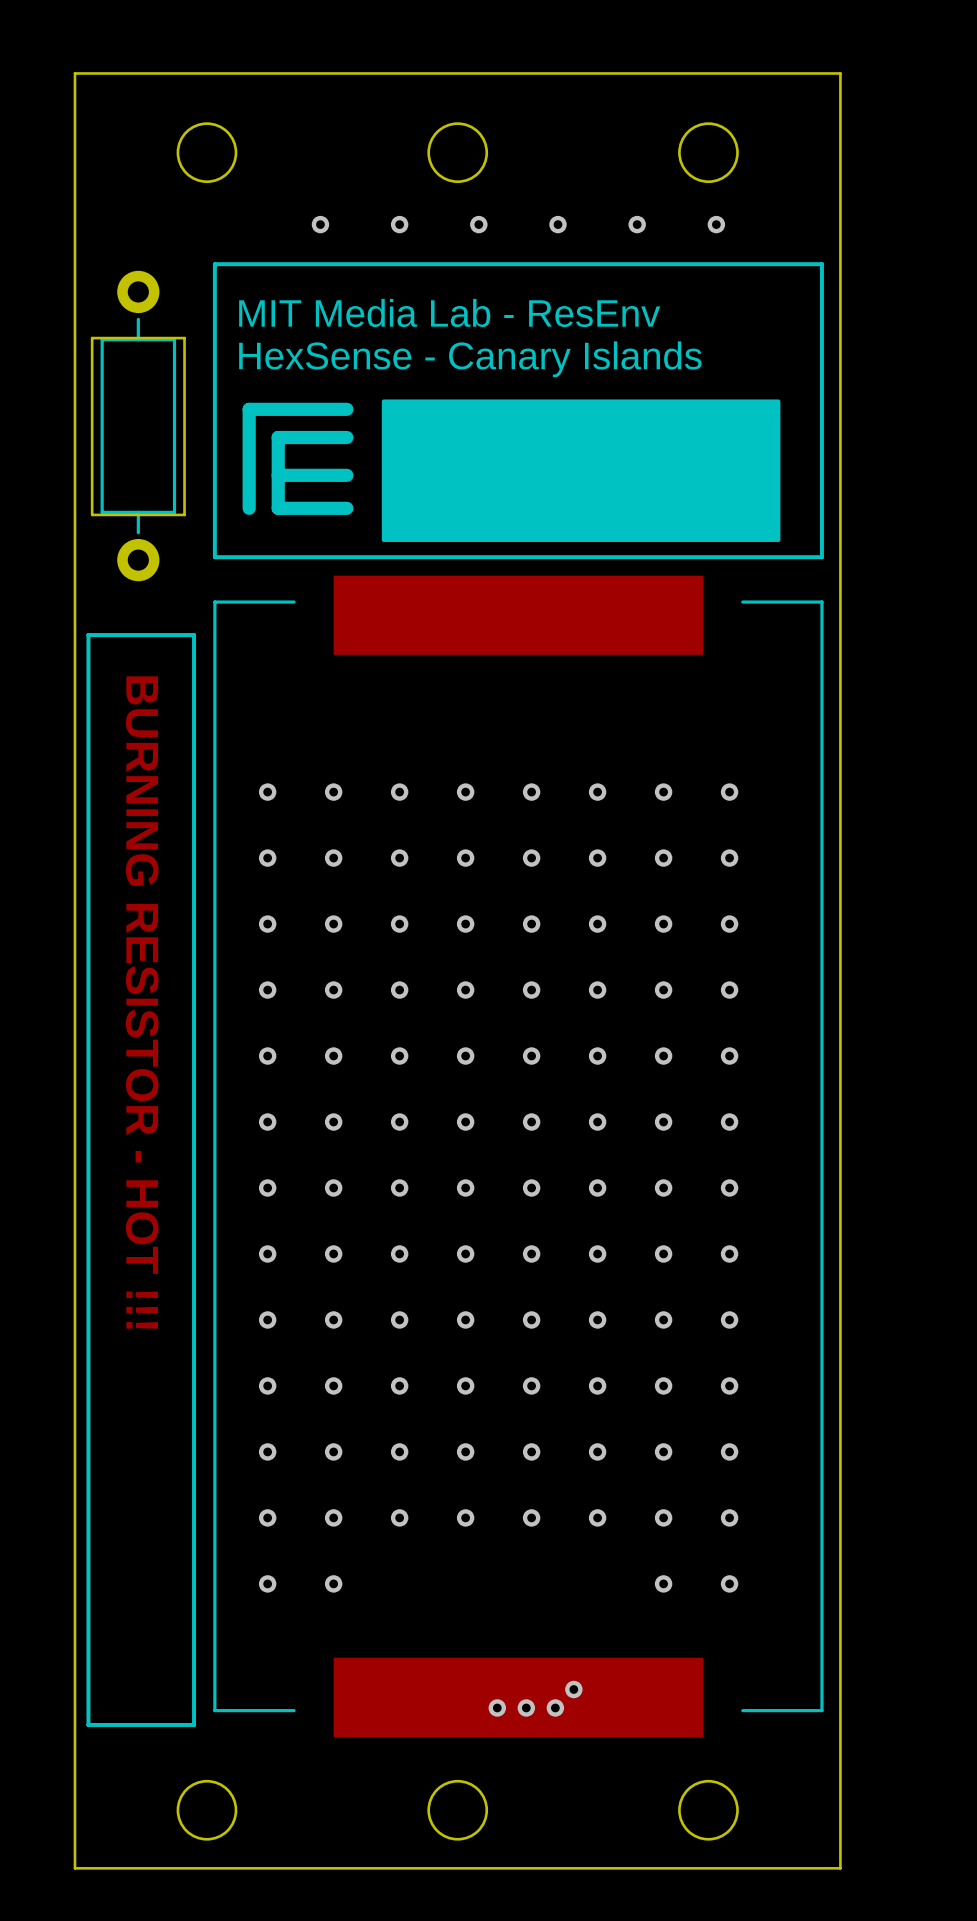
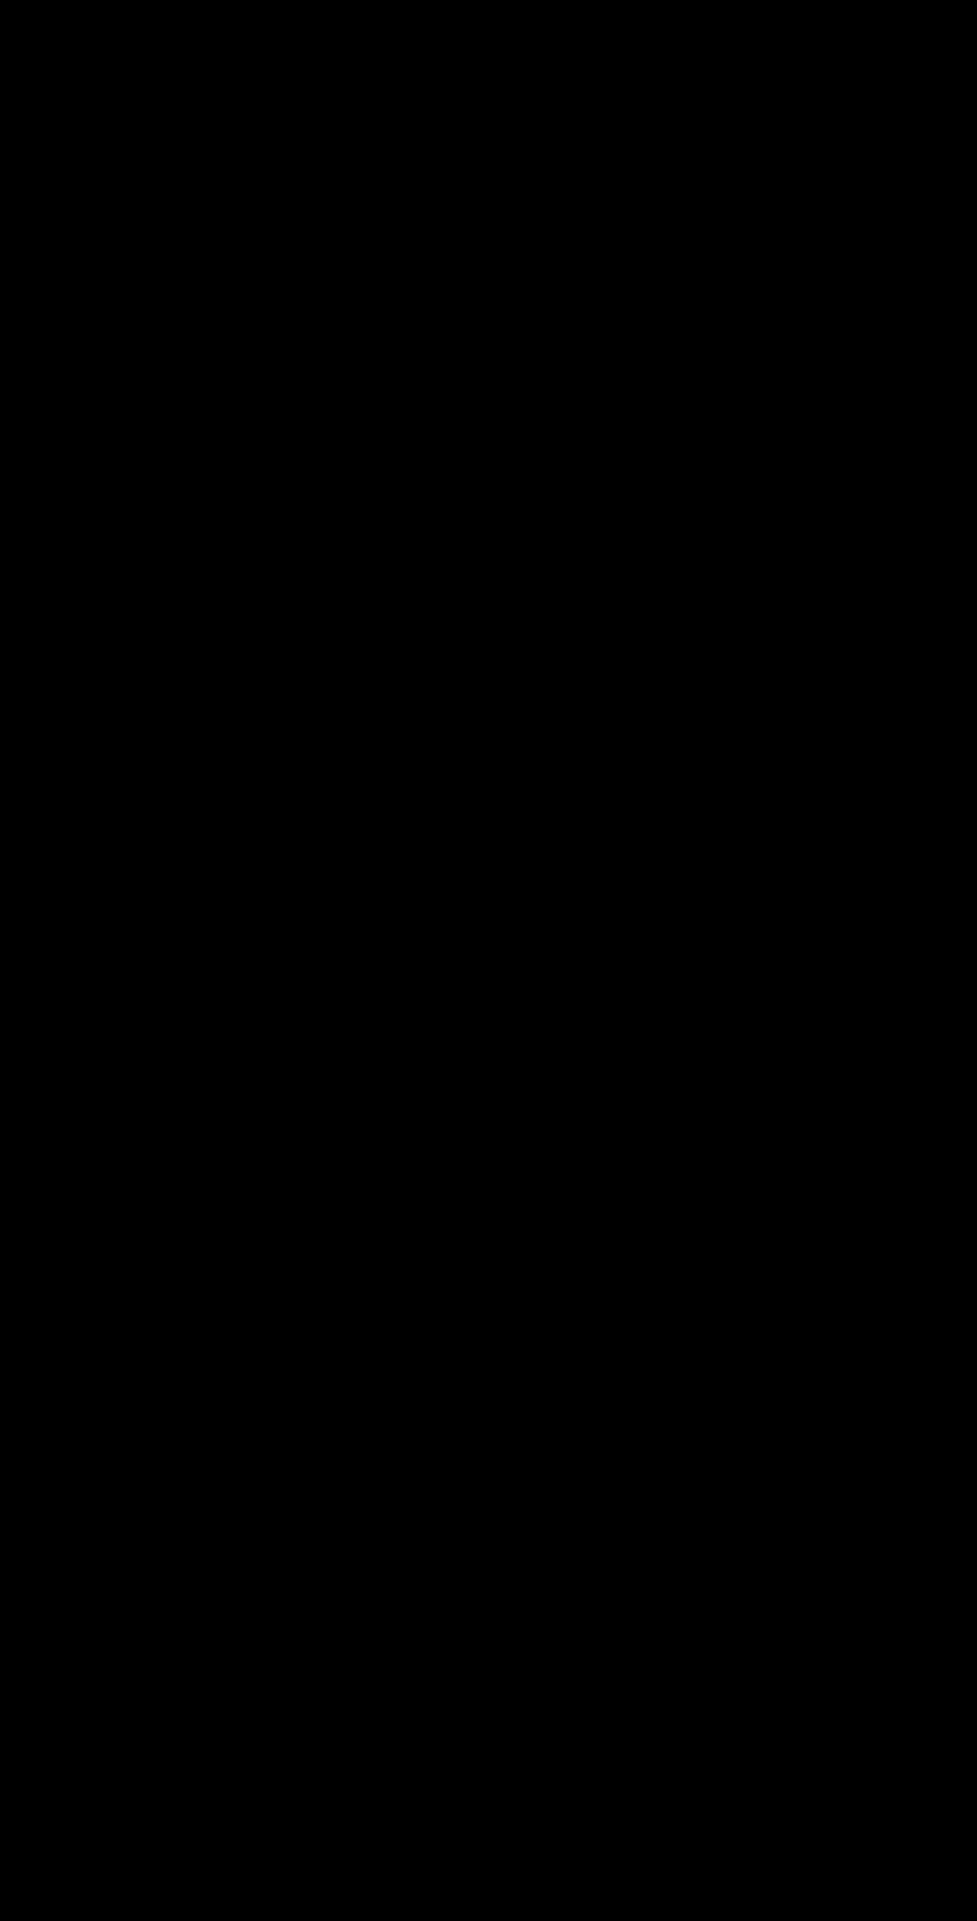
board edge: (74, 73) (840, 73) (840, 1868) (74, 1868) (74, 73) -> none
round board edge: [176, 122, 238, 184] -> none
round board edge: [427, 122, 489, 184] -> none
round board edge: [678, 122, 739, 184] -> none
via: (320, 224) -> none
via: (399, 224) -> none
via: (478, 224) -> none
via: (558, 224) -> none
via: (637, 224) -> none
via: (716, 224) -> none
line: (214, 264) (821, 264) (821, 557) (214, 557) (214, 264) -> none
text: MIT Media Lab - ResEnv (449, 312) -> none
board edge: (92, 338) (184, 338) (184, 514) (92, 514) (92, 338) -> none
text: HexSense - Canary Islands (470, 359) -> none
drawing: [381, 399, 781, 542] -> none
line: (346, 409) (249, 409) (249, 508) -> none
part: (138, 426) -> none
line: (346, 437) (278, 437) (278, 508) (346, 508) -> none
line: (278, 475) (346, 475) -> none
line: (88, 635) (194, 635) (194, 1724) (88, 1724) (88, 635) -> none
via: (267, 792) -> none
via: (333, 792) -> none
via: (399, 792) -> none
via: (465, 792) -> none
via: (531, 792) -> none
via: (597, 792) -> none
via: (663, 792) -> none
via: (729, 792) -> none
via: (267, 858) -> none
via: (333, 858) -> none
via: (399, 858) -> none
via: (465, 858) -> none
via: (531, 858) -> none
via: (597, 858) -> none
via: (663, 858) -> none
via: (729, 858) -> none
via: (267, 924) -> none
via: (333, 924) -> none
via: (399, 924) -> none
via: (465, 924) -> none
via: (531, 924) -> none
via: (597, 924) -> none
via: (663, 924) -> none
via: (729, 924) -> none
via: (267, 990) -> none
via: (333, 990) -> none
via: (399, 990) -> none
via: (465, 990) -> none
via: (531, 990) -> none
via: (597, 990) -> none
via: (663, 990) -> none
via: (729, 990) -> none
text: BURNING RESISTOR - HOT !!! (142, 1002) -> none
via: (267, 1056) -> none
via: (333, 1056) -> none
via: (399, 1056) -> none
via: (465, 1056) -> none
via: (531, 1056) -> none
via: (597, 1056) -> none
via: (663, 1056) -> none
via: (729, 1056) -> none
via: (267, 1122) -> none
via: (333, 1122) -> none
via: (399, 1122) -> none
via: (465, 1122) -> none
via: (531, 1122) -> none
via: (597, 1122) -> none
via: (663, 1122) -> none
via: (729, 1122) -> none
part: (518, 1156) -> none
via: (267, 1187) -> none
via: (333, 1187) -> none
via: (399, 1187) -> none
via: (465, 1187) -> none
via: (531, 1187) -> none
via: (597, 1187) -> none
via: (663, 1187) -> none
via: (729, 1187) -> none
via: (267, 1253) -> none
via: (333, 1253) -> none
via: (399, 1253) -> none
via: (465, 1253) -> none
via: (531, 1253) -> none
via: (597, 1253) -> none
via: (663, 1253) -> none
via: (729, 1253) -> none
via: (267, 1319) -> none
via: (333, 1319) -> none
via: (399, 1319) -> none
via: (465, 1319) -> none
via: (531, 1319) -> none
via: (597, 1319) -> none
via: (663, 1319) -> none
via: (729, 1319) -> none
via: (267, 1385) -> none
via: (333, 1385) -> none
via: (399, 1385) -> none
via: (465, 1385) -> none
via: (531, 1385) -> none
via: (597, 1385) -> none
via: (663, 1385) -> none
via: (729, 1385) -> none
via: (267, 1451) -> none
via: (333, 1451) -> none
via: (399, 1451) -> none
via: (465, 1451) -> none
via: (531, 1451) -> none
via: (597, 1451) -> none
via: (663, 1451) -> none
via: (729, 1451) -> none
via: (267, 1517) -> none
via: (333, 1517) -> none
via: (399, 1517) -> none
via: (465, 1517) -> none
via: (531, 1517) -> none
via: (597, 1517) -> none
via: (663, 1517) -> none
via: (729, 1517) -> none
via: (267, 1583) -> none
via: (333, 1583) -> none
via: (663, 1583) -> none
via: (729, 1583) -> none
via: (573, 1689) -> none
via: (497, 1707) -> none
via: (526, 1707) -> none
via: (555, 1707) -> none
round board edge: [176, 1779, 238, 1841] -> none
round board edge: [427, 1779, 489, 1841] -> none
round board edge: [678, 1779, 739, 1841] -> none

